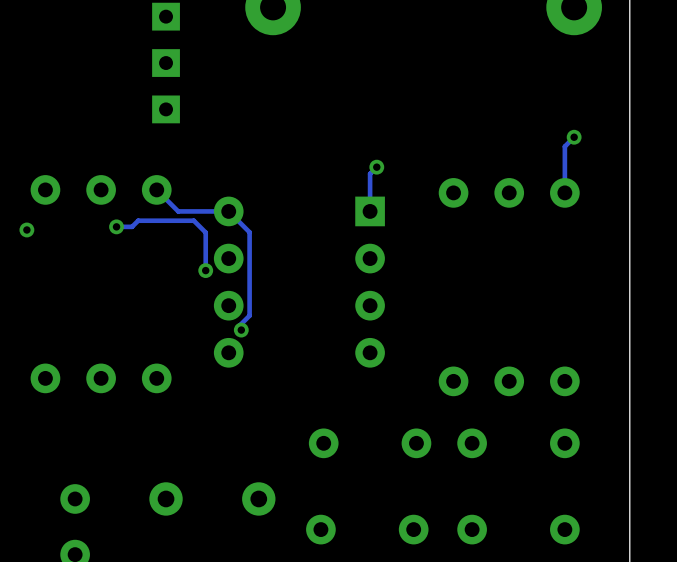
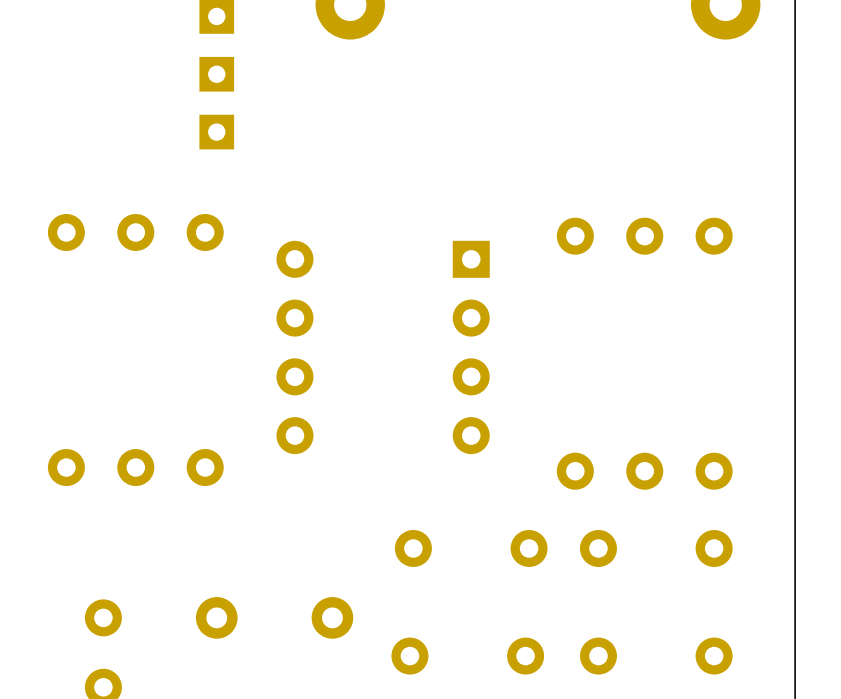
track: (574, 137) (564, 146) (564, 192) -> none
via: (574, 137) -> none
track: (376, 167) (370, 173) (370, 211) -> none
via: (376, 167) -> none
track: (156, 189) (178, 211) (228, 211) (249, 232) (249, 315) (240, 325) (241, 330) -> none
track: (116, 226) (132, 226) (138, 220) (193, 220) (205, 232) (205, 270) -> none
via: (116, 226) -> none
via: (26, 229) -> none
via: (205, 270) -> none
via: (241, 330) -> none

